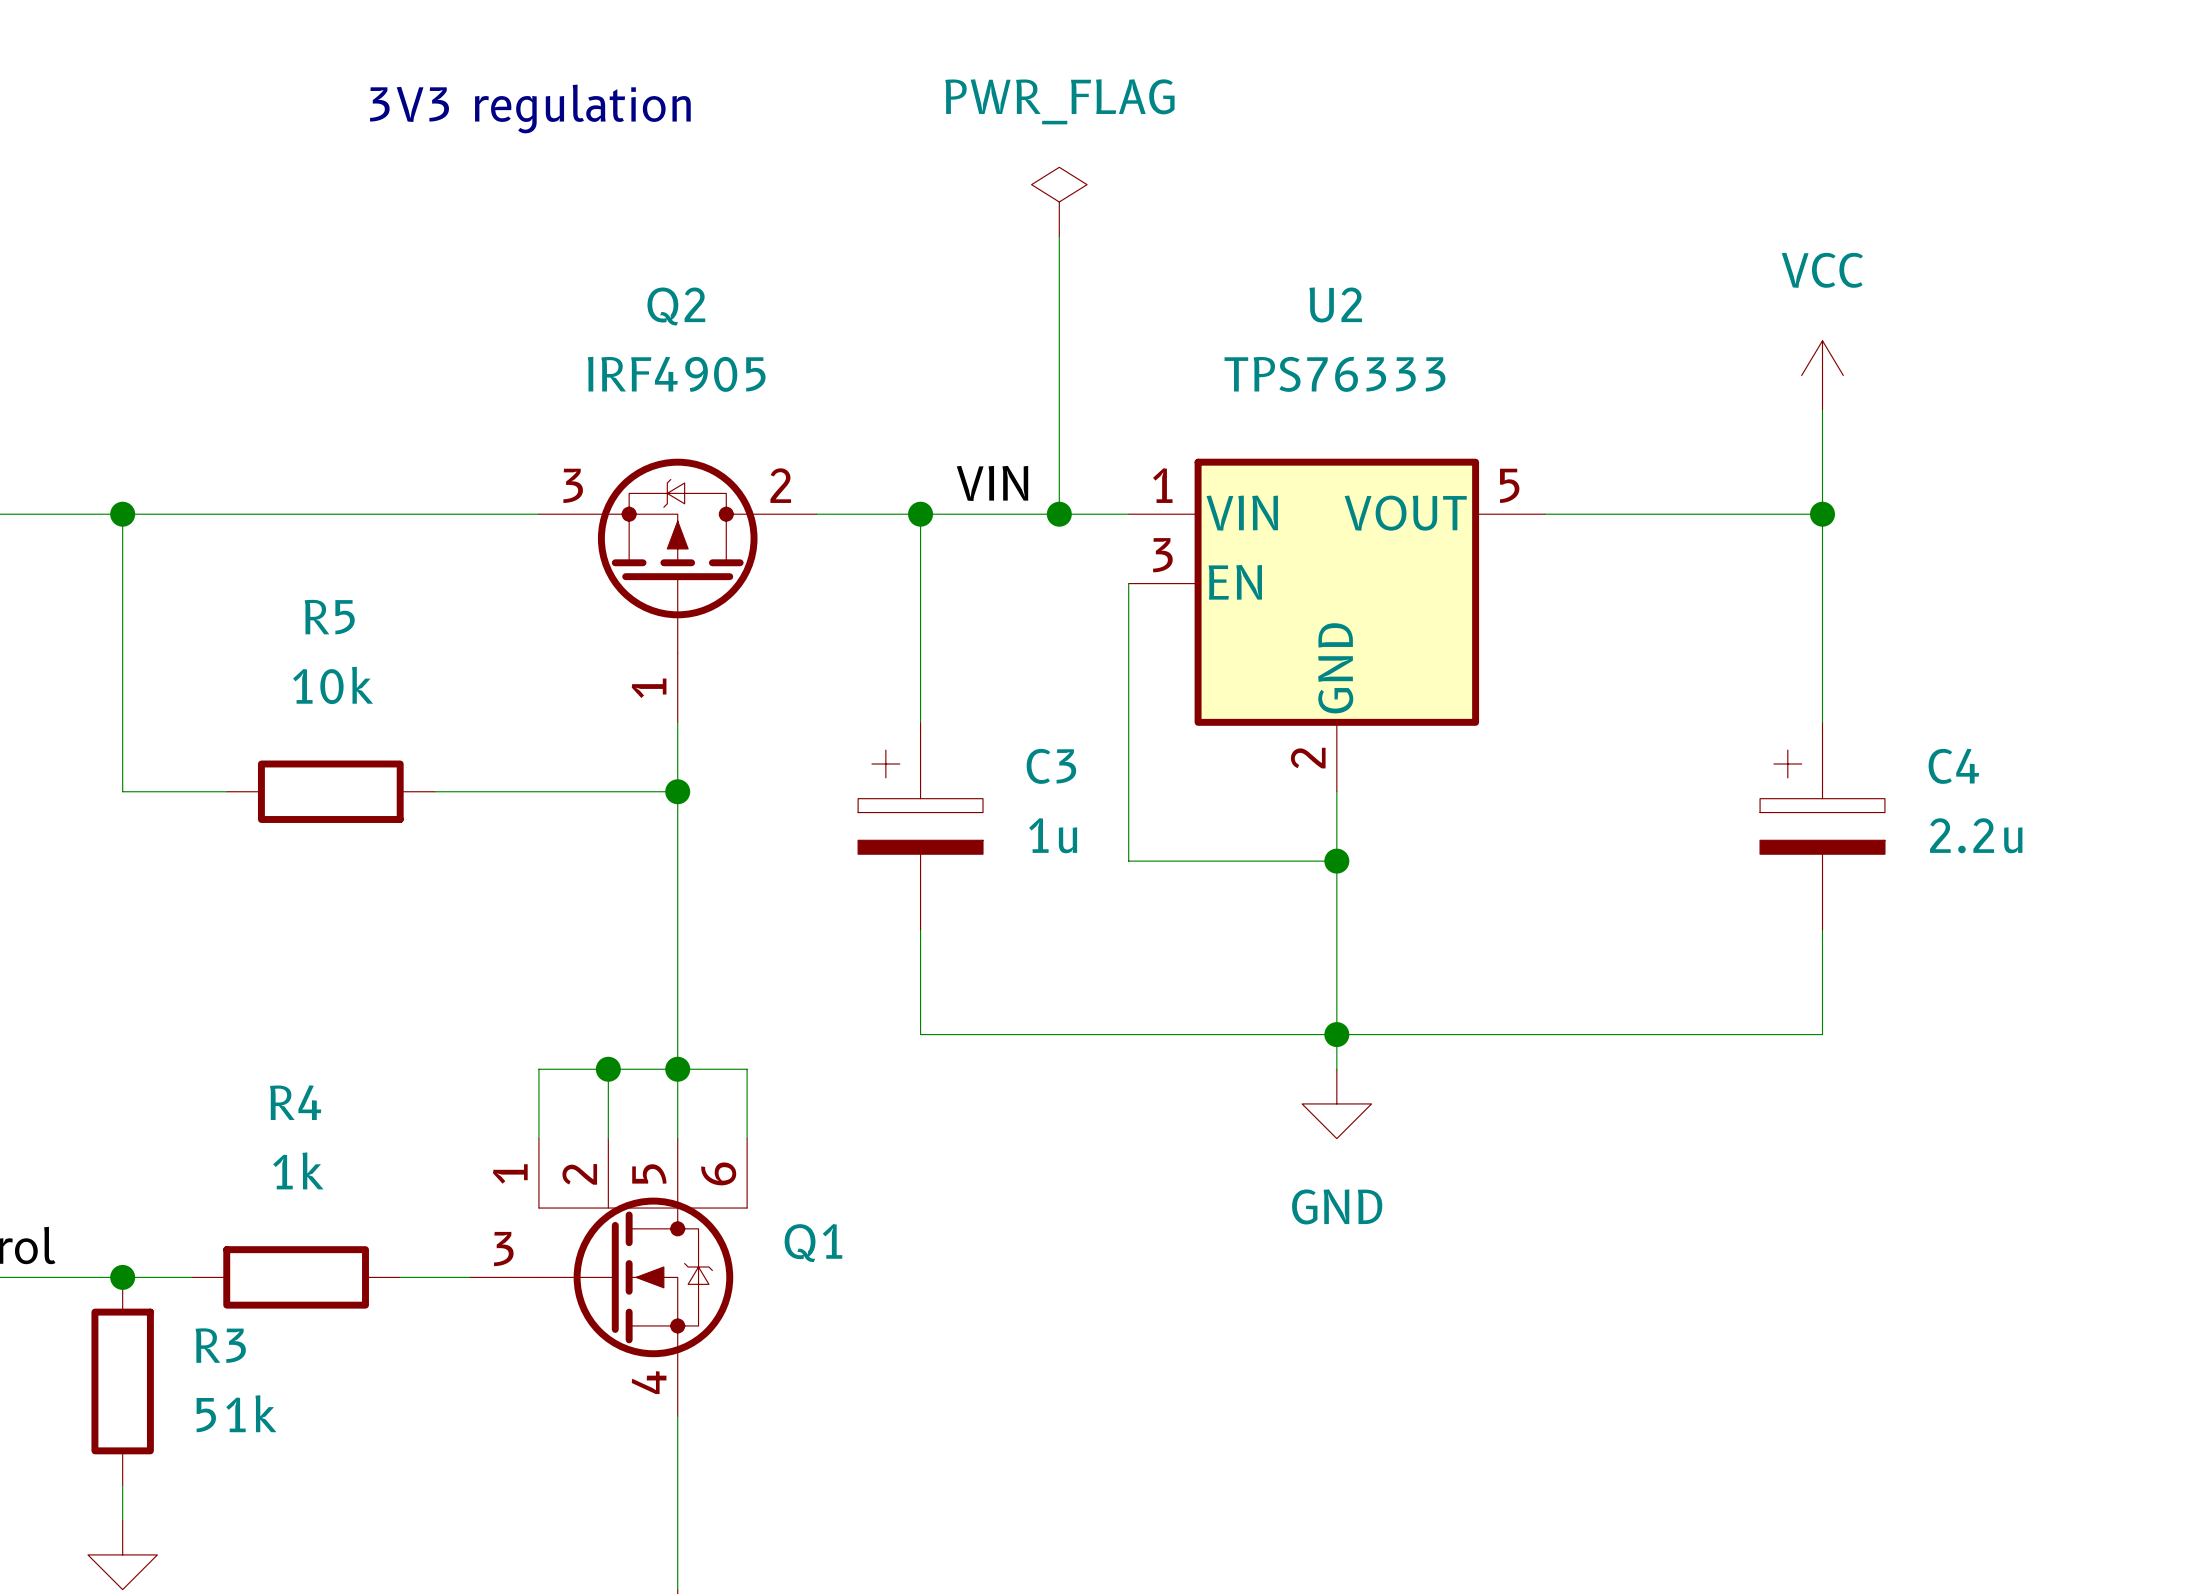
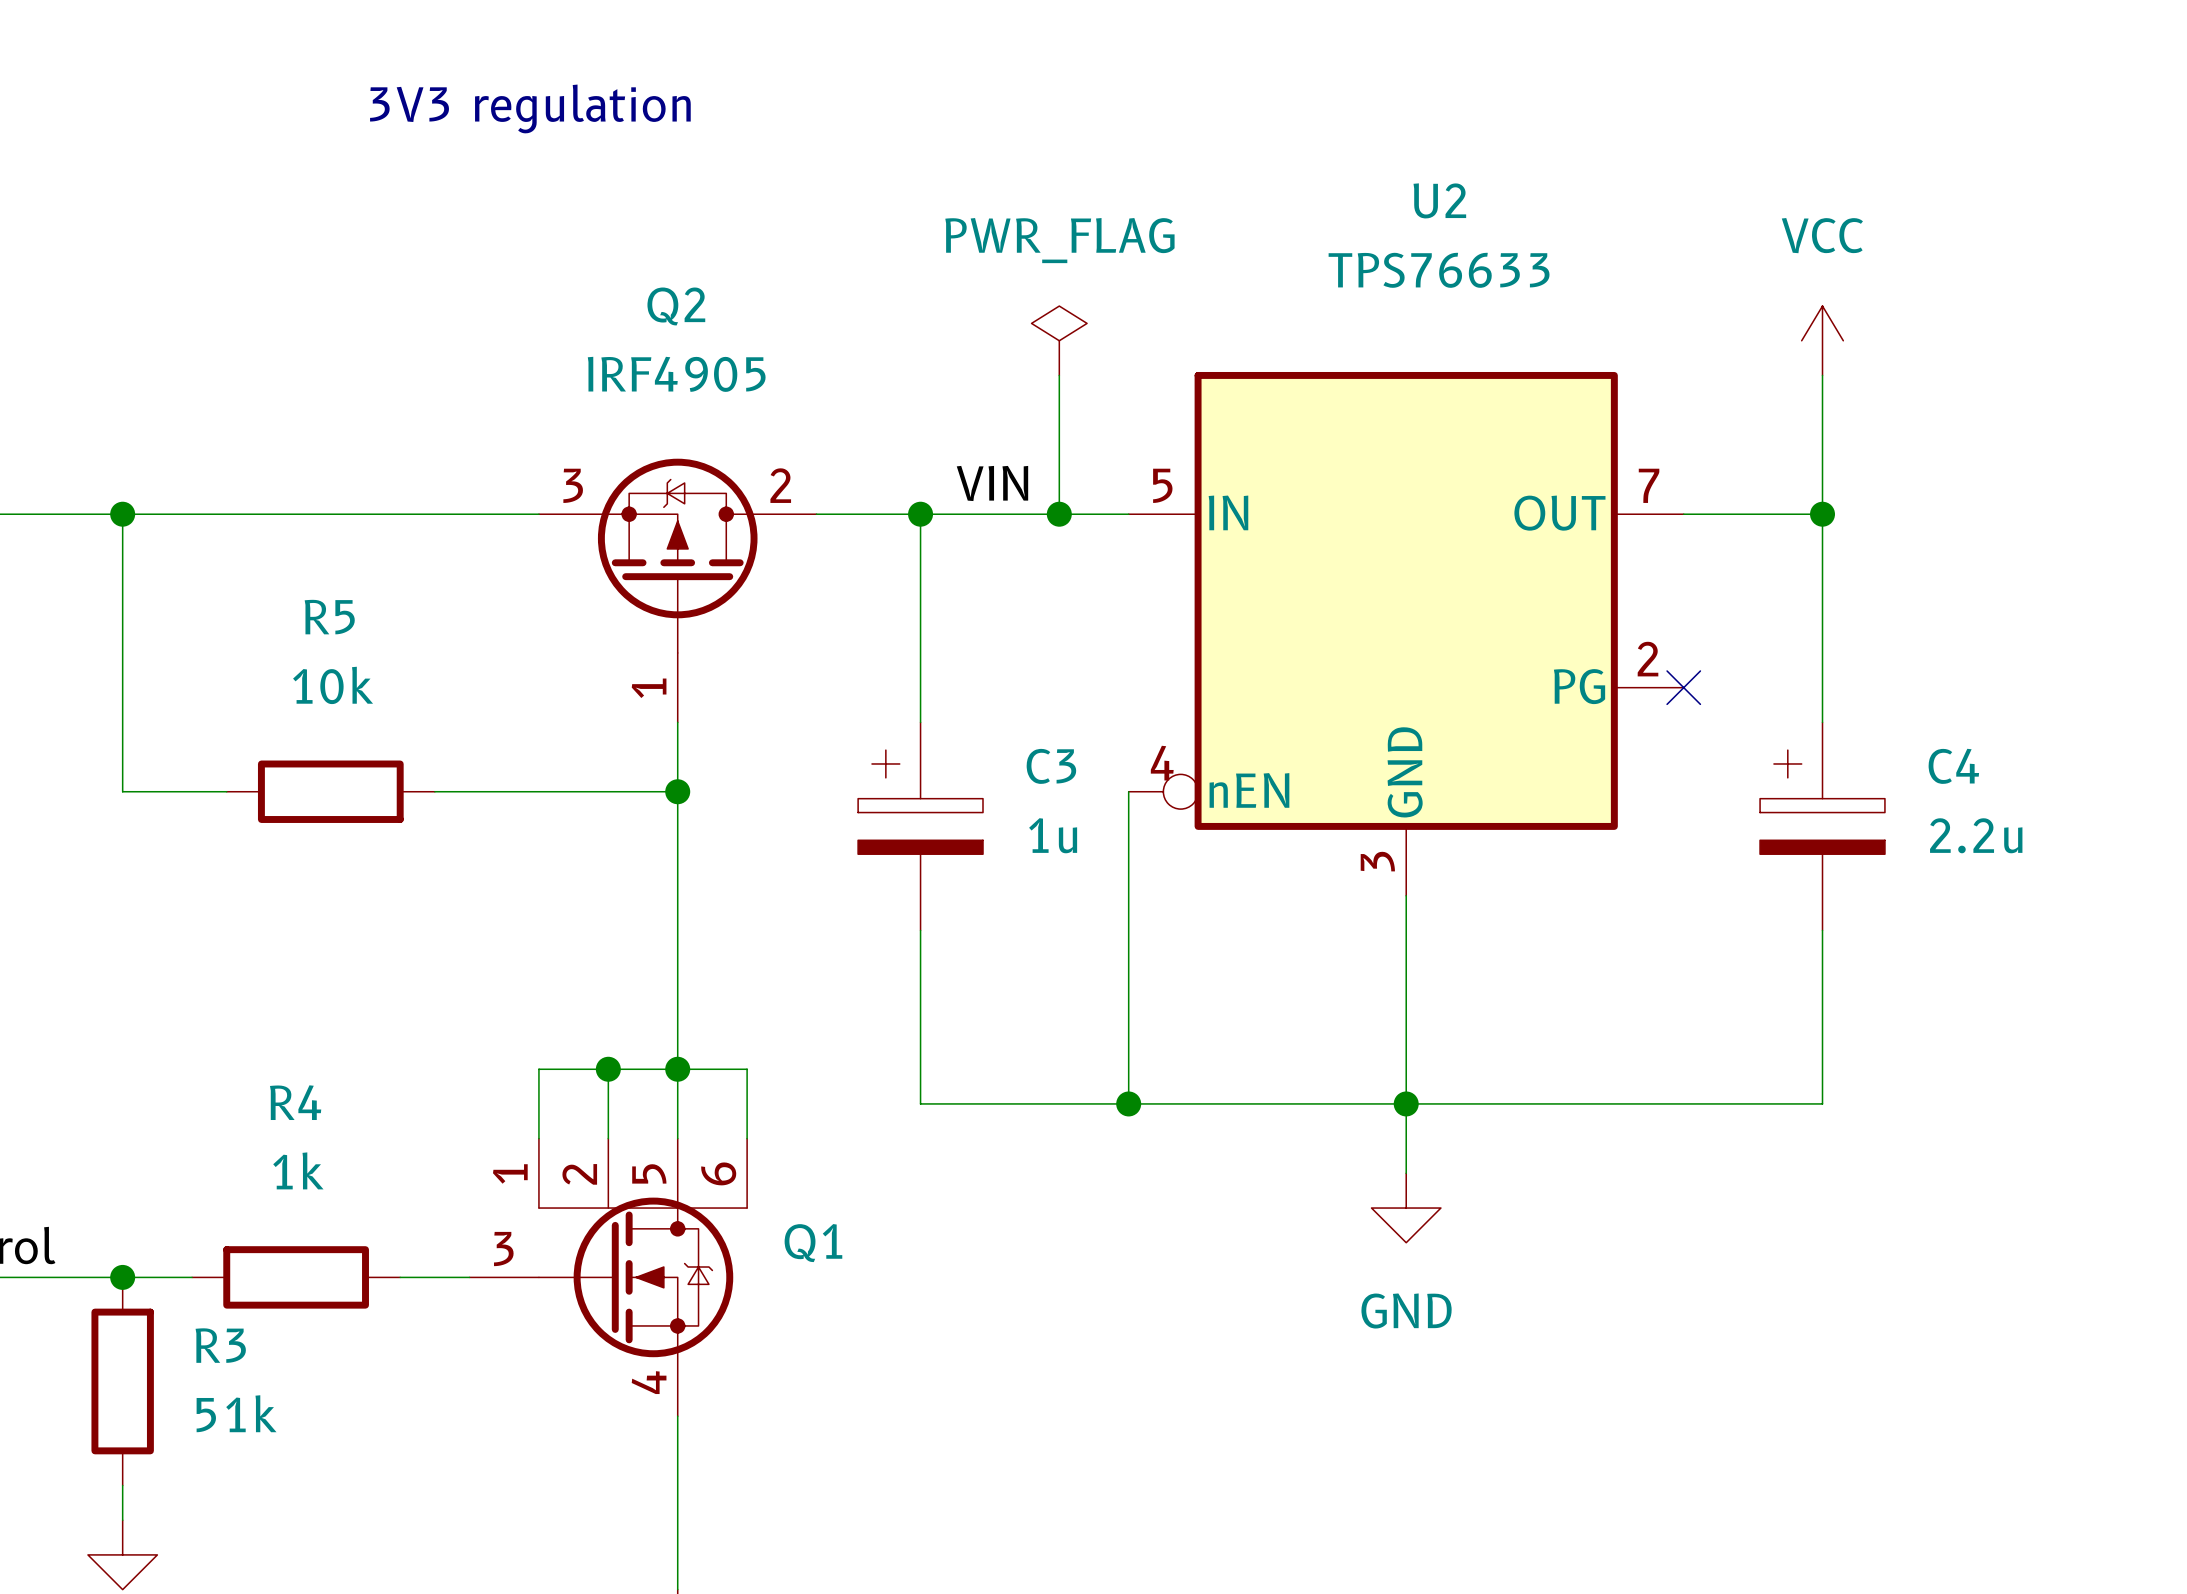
power symbol position: PWR_FLAG (1059, 202) -> PWR_FLAG (1059, 340)
wire: (1059, 236) (1059, 375) -> none
U2 name position: U2 (1335, 304) -> U2 (1439, 200)
U2 value: TPS76333 (1334, 374) -> TPS76633 (1439, 270)
power symbol position: VCC (1822, 375) -> VCC (1822, 340)
U2 symbol: [1128, 458, 1545, 792] -> [1128, 371, 1684, 896]
wire: (1128, 583) (1128, 791) -> none
no-connect mark: none -> (1683, 687)
wire: (1336, 791) (1336, 1069) -> (1406, 895) (1406, 1173)
wire: (1128, 861) (1336, 861) -> (1128, 861) (1128, 1103)
junction: (1336, 861) -> none
wire: (920, 1034) (1822, 1034) -> (920, 1034) (920, 1103) (1822, 1103) (1822, 1034)
junction position: (1336, 1034) -> (1406, 1103)
junction: none -> (1128, 1103)
power symbol position: GND (1336, 1103) -> GND (1406, 1208)

